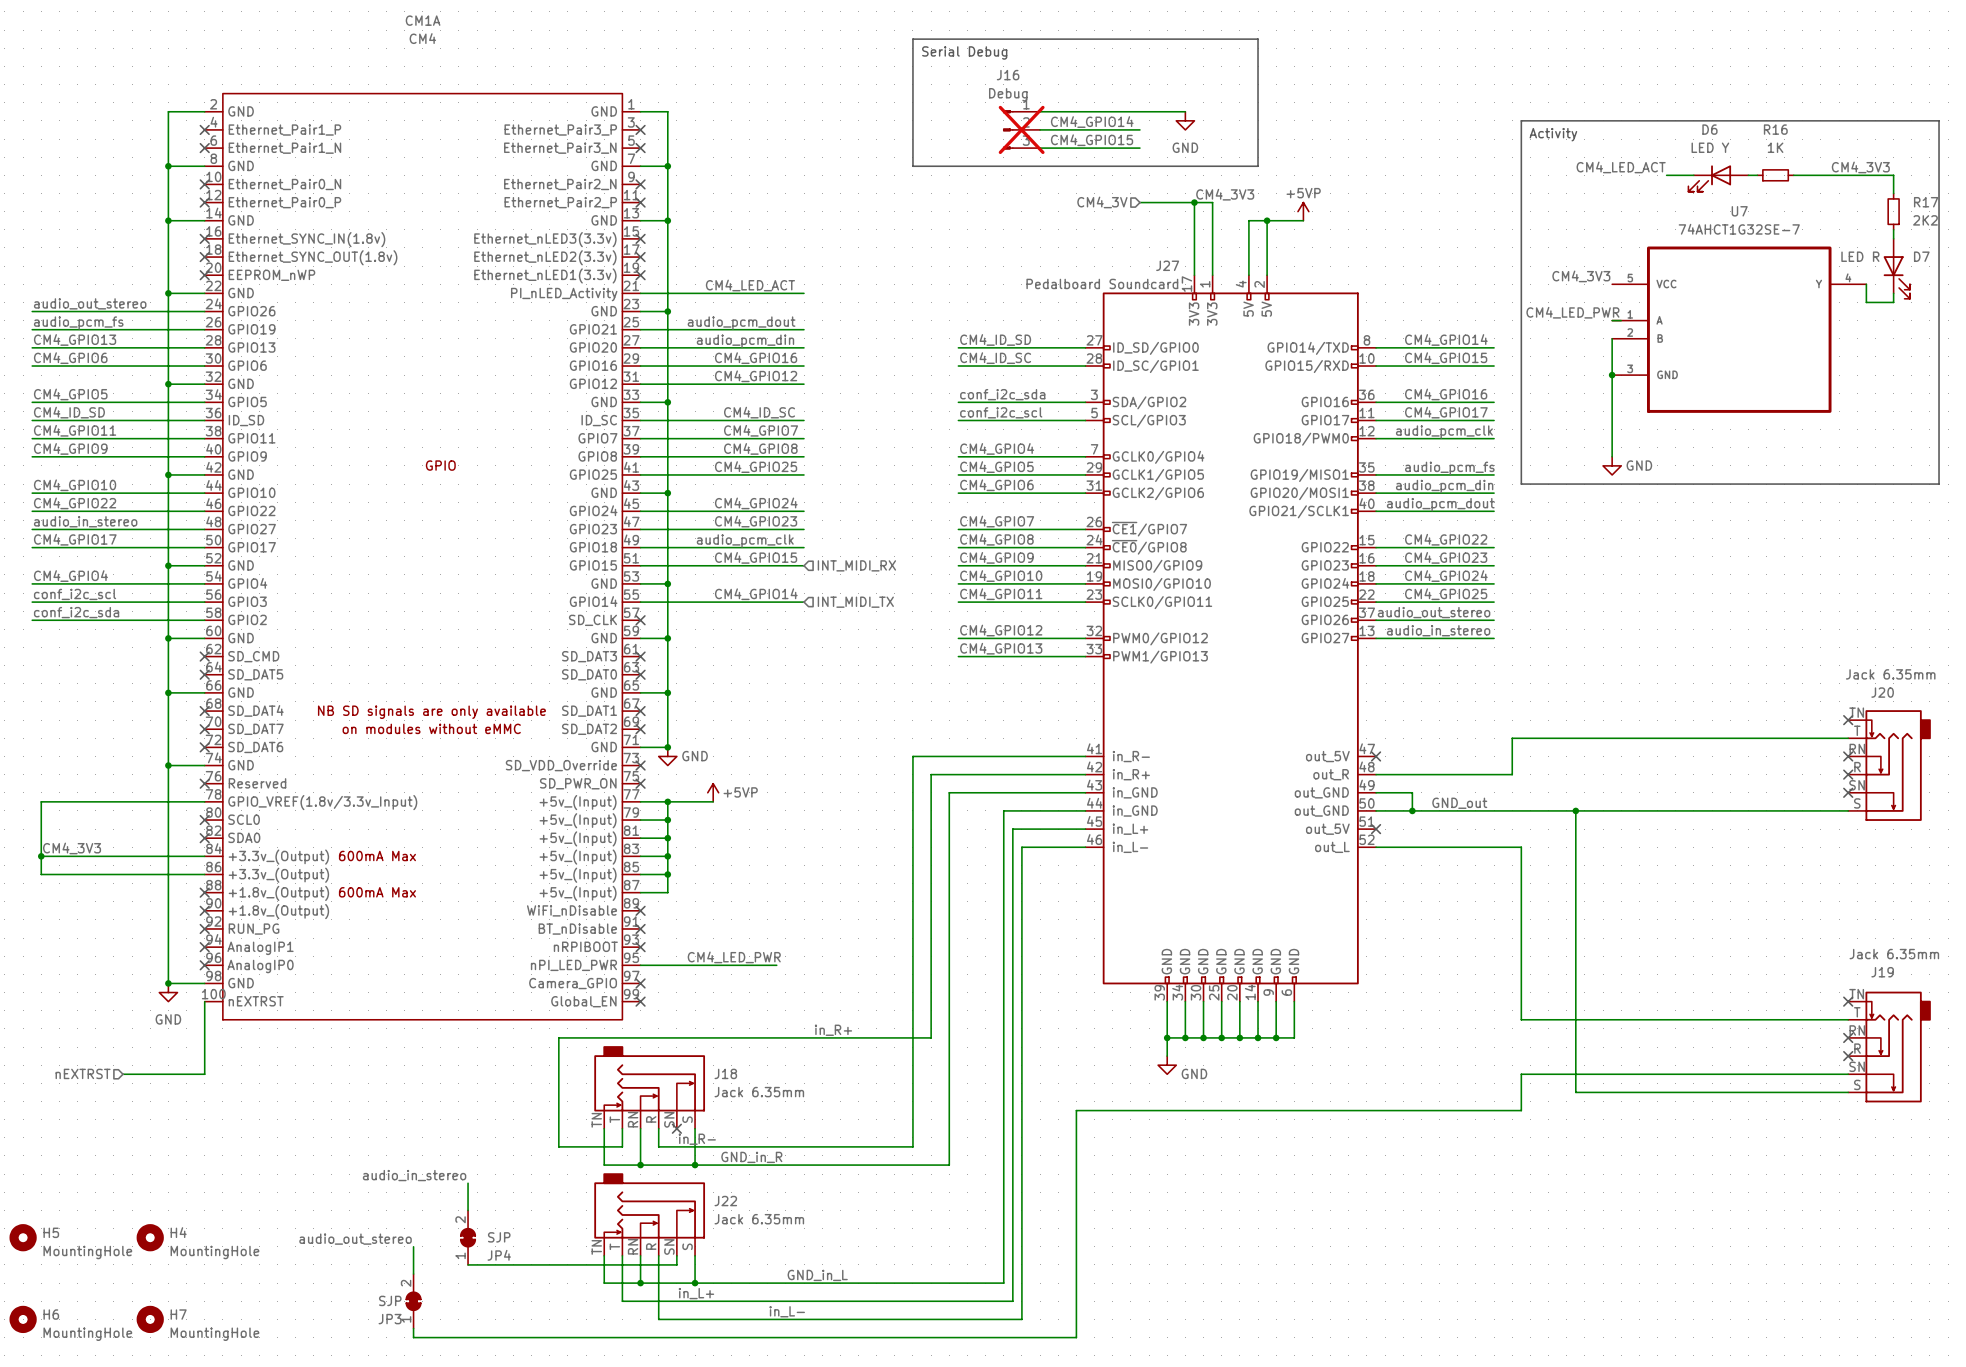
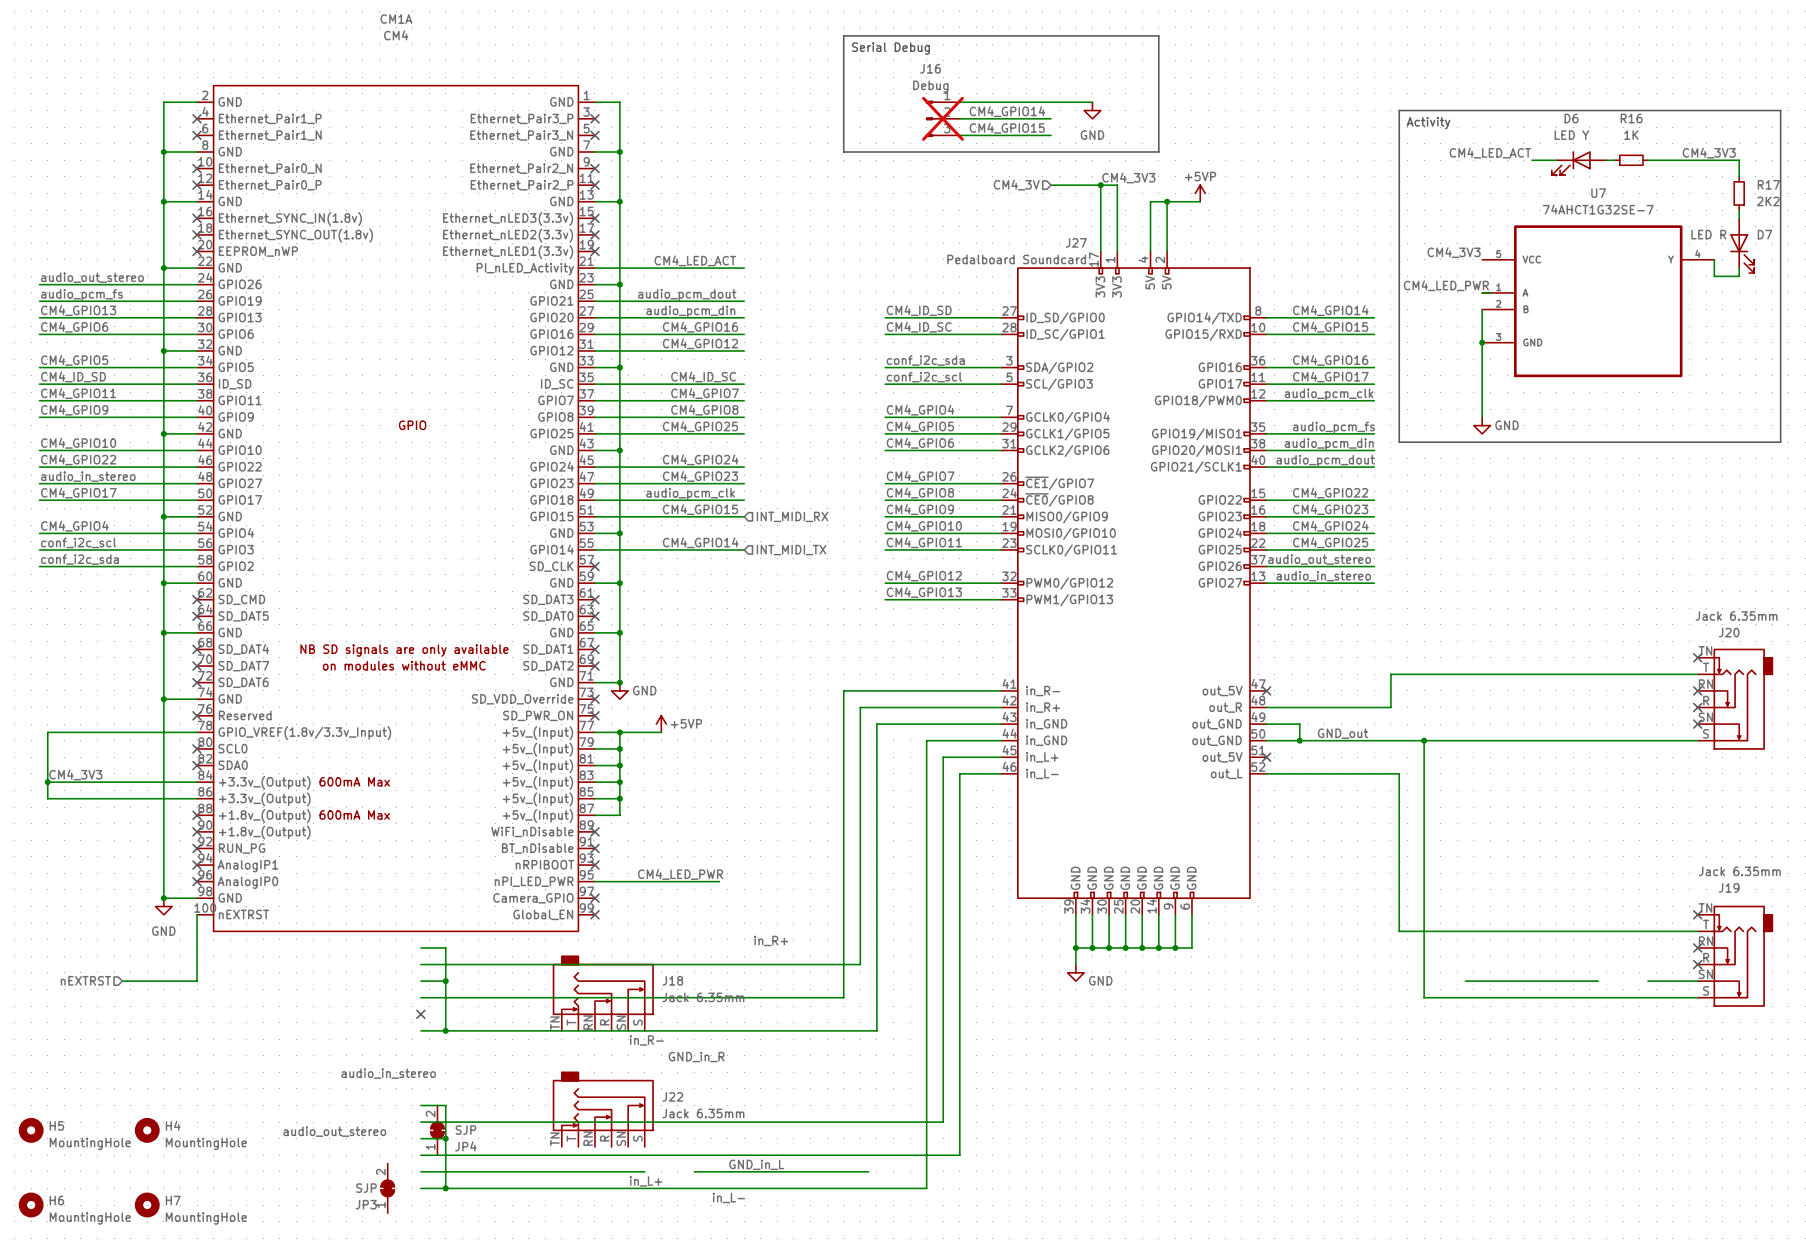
wire: (1575, 810) (1575, 1092) -> (1424, 740) (1424, 997) (1449, 997)
junction position: (1575, 810) -> (1424, 740)
wire: (1021, 829) (1012, 829) (1012, 1301) (1003, 1301) -> none
wire: (1021, 847) (1040, 847) -> (943, 773) (943, 757)
wire: none -> (420, 947) (445, 947) (445, 1030)
wire: (931, 1037) (558, 1037) (558, 1146) (622, 1146) (622, 1128) -> (860, 947) (860, 964) (420, 964)
wire: none -> (420, 981) (445, 981)
junction: none -> (445, 981)
wire: (1593, 1074) (1521, 1074) (1521, 1110) (1076, 1110) (1076, 1337) (413, 1337) (413, 1328) -> none
wire: (1739, 1074) (1793, 1074) -> none
wire: (912, 1092) (912, 1146) (658, 1146) (658, 1128) -> (843, 997) (420, 997)
no-connect mark: none -> (420, 1014)
junction: none -> (445, 1030)
wire: (604, 1128) (604, 1165) (949, 1165) (949, 1128) -> (420, 1030) (876, 1030)
wire: (640, 1128) (640, 1165) -> none
no-connect mark: (676, 1128) -> none
wire: (695, 1128) (695, 1165) -> none
junction: (640, 1165) -> none
junction: (695, 1165) -> none
wire: (468, 1183) (468, 1210) -> none
wire: none -> (420, 1105) (445, 1105) (445, 1188)
wire: (1021, 1228) (1021, 1319) (658, 1319) (658, 1255) -> (943, 1122) (420, 1122)
wire: (413, 1246) (413, 1274) -> none
wire: none -> (420, 1138) (445, 1138)
junction: none -> (445, 1138)
wire: (604, 1255) (604, 1283) -> (420, 1171) (561, 1171)
wire: (622, 1255) (622, 1301) -> (420, 1188) (578, 1188)
wire: (640, 1255) (640, 1283) -> none
wire: (676, 1255) (676, 1264) -> (959, 773) (959, 1155) (628, 1155)
wire: (695, 1255) (695, 1283) (749, 1283) -> none
wire: none -> (420, 1155) (437, 1155)
junction: (640, 1283) -> none
junction: (695, 1283) -> none
wire: (940, 1283) (1003, 1283) -> (926, 1188) (926, 1171)
junction: none -> (445, 1188)

